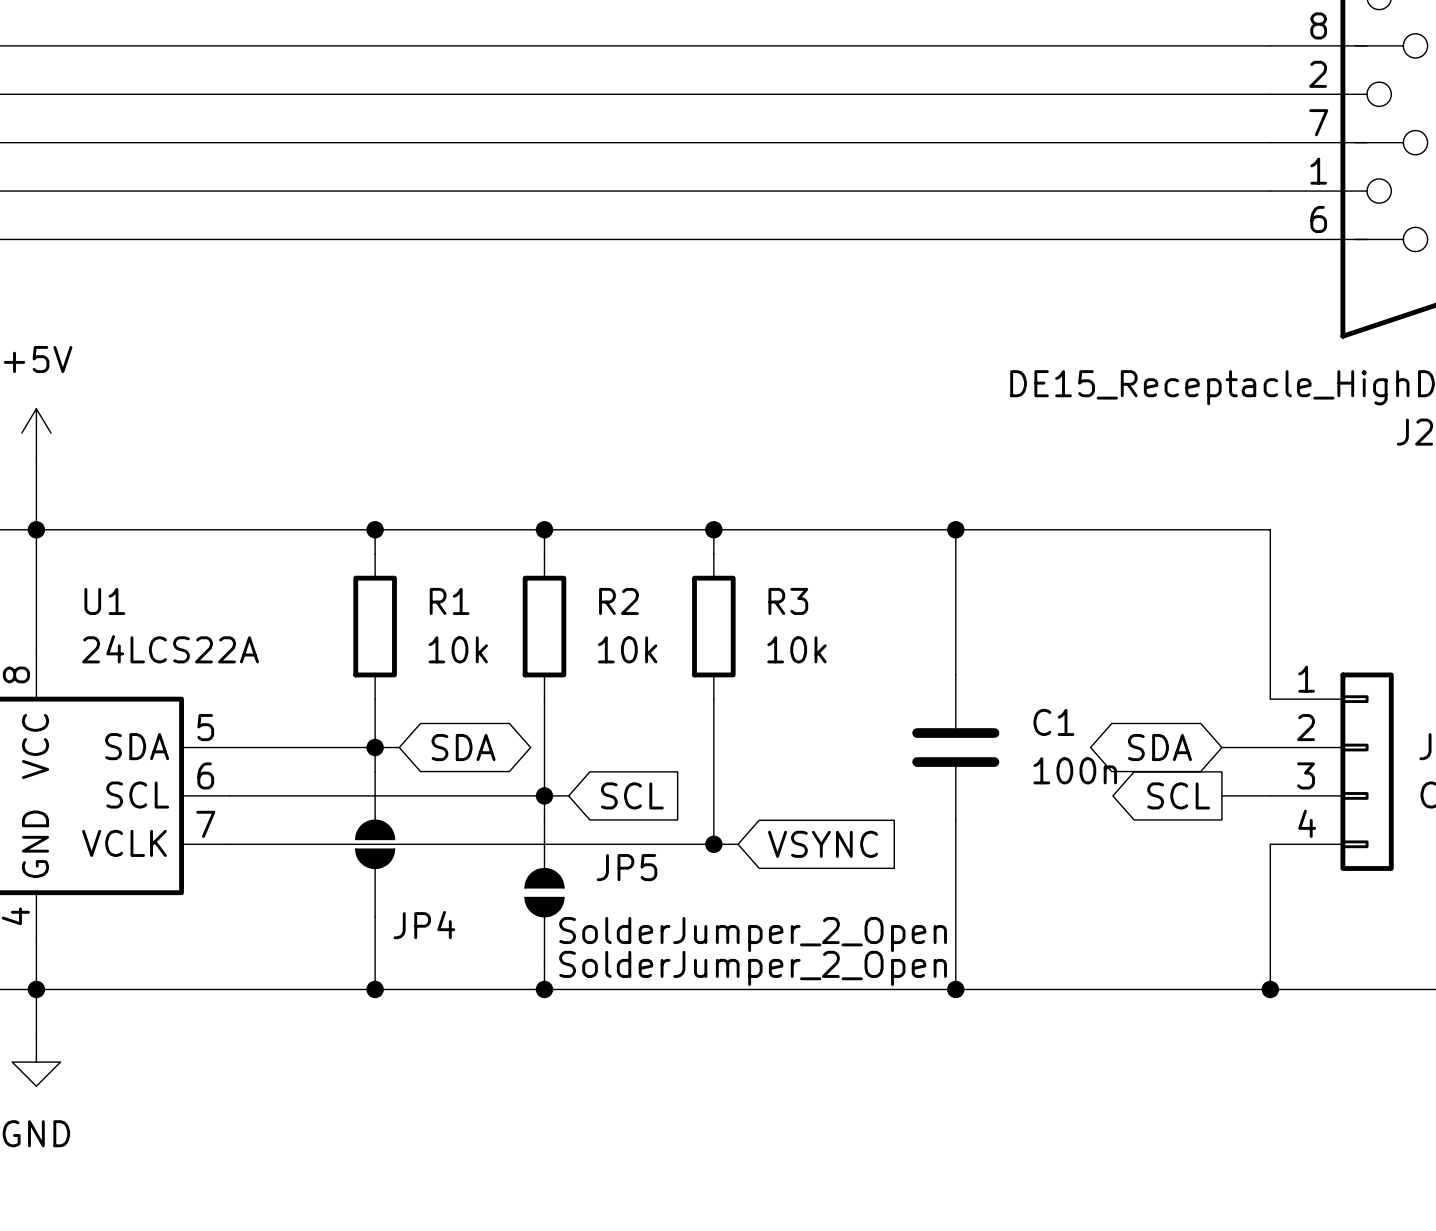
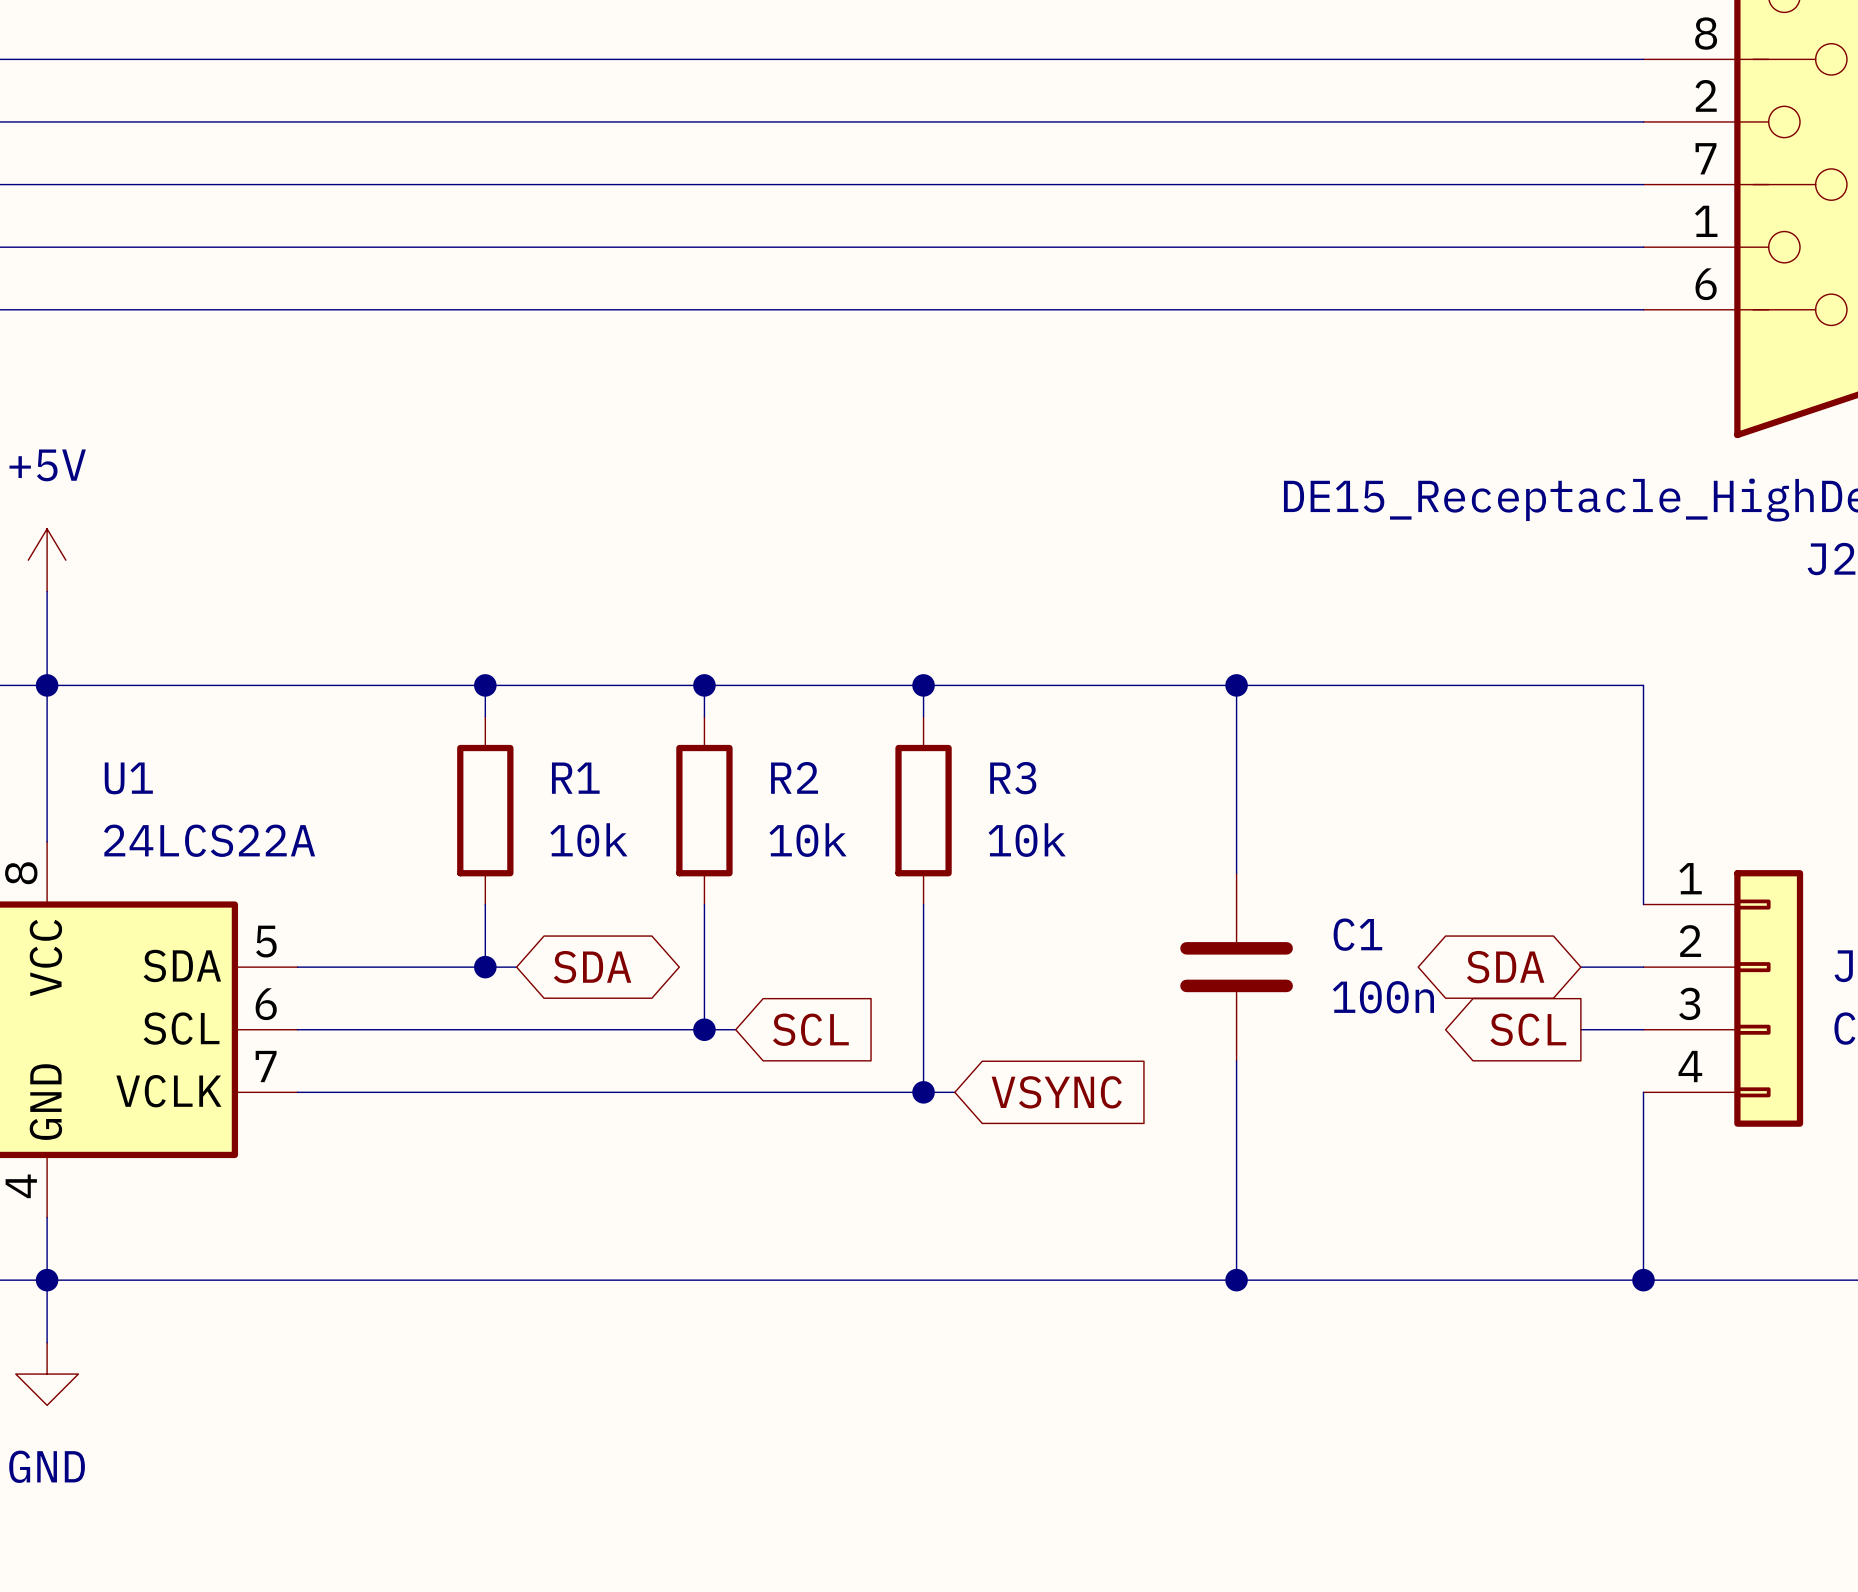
wire: (375, 747) (375, 771) -> none
wire: (544, 795) (544, 820) -> none
JP4: SolderJumper_2_Open (375, 844) -> none
JP5: SolderJumper_2_Open (544, 892) -> none
wire: (375, 916) (375, 989) -> none
wire: (544, 965) (544, 989) -> none
junction: (375, 989) -> none
junction: (544, 989) -> none

